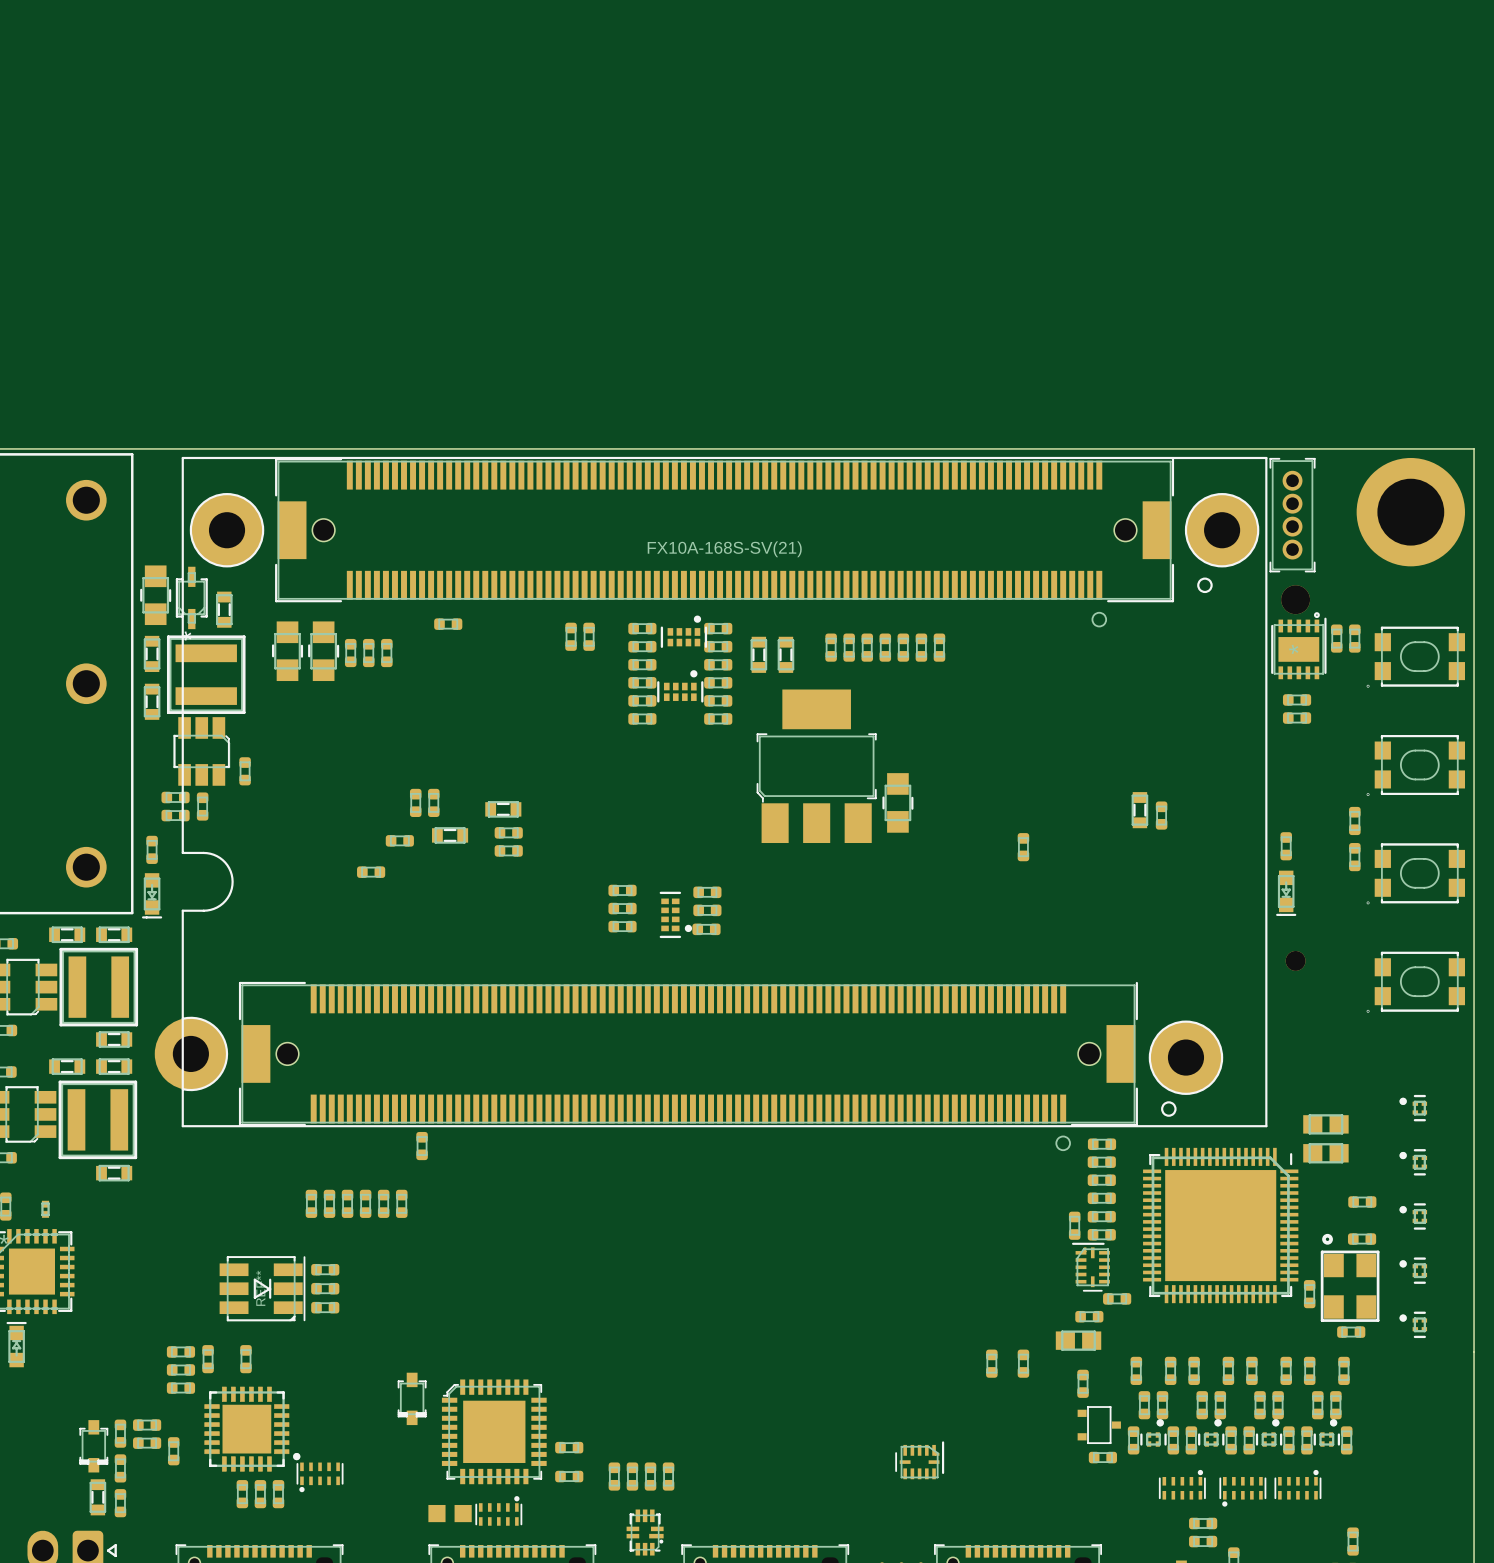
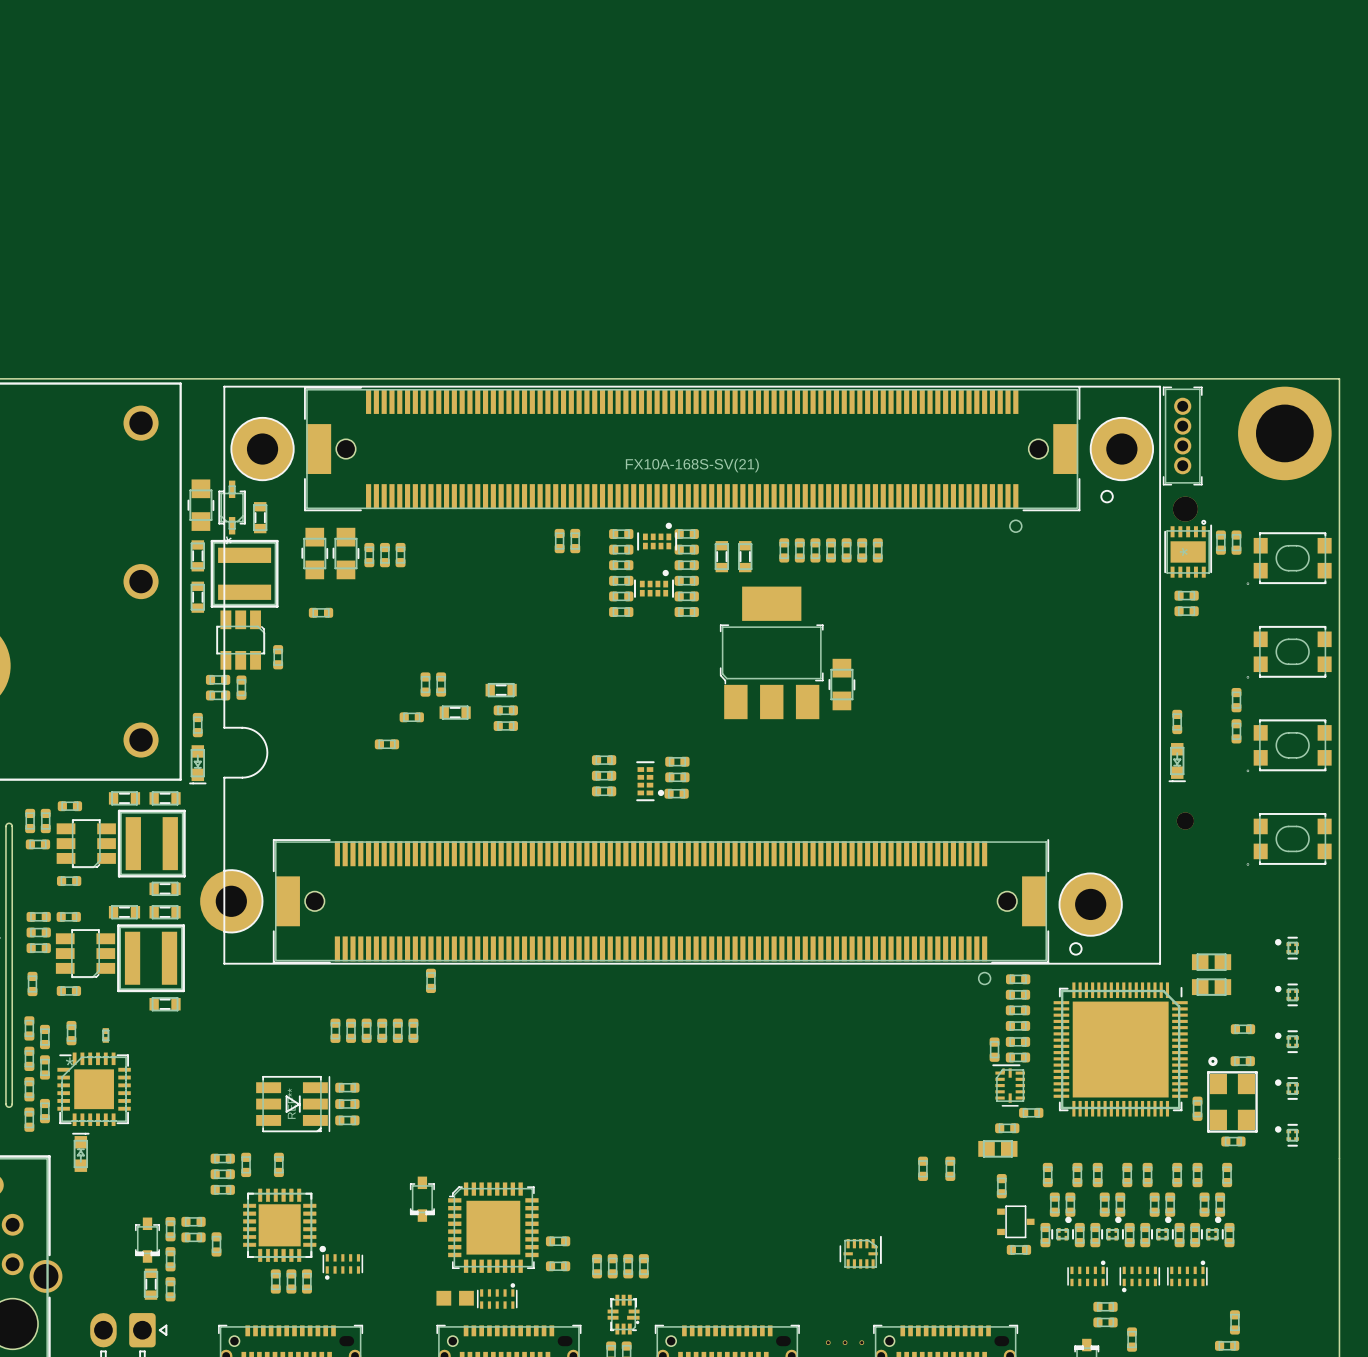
part position: (448, 624) -> (321, 612)
part: (1139, 810) -> none
part: (1161, 815) -> none
part: (1023, 847) -> none

